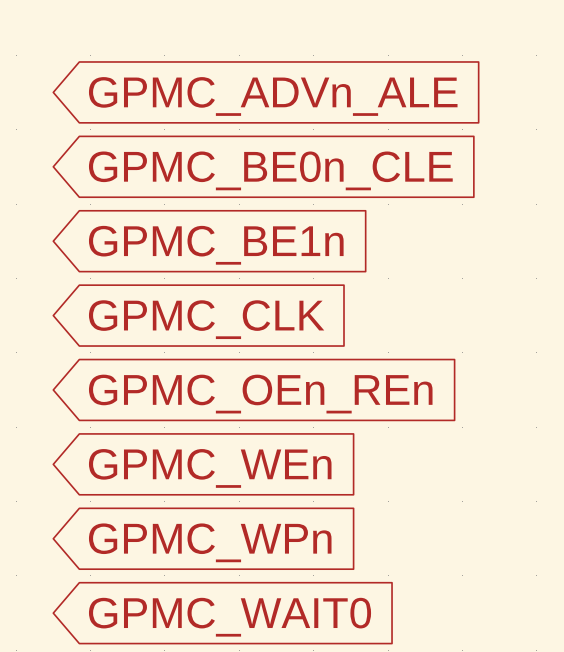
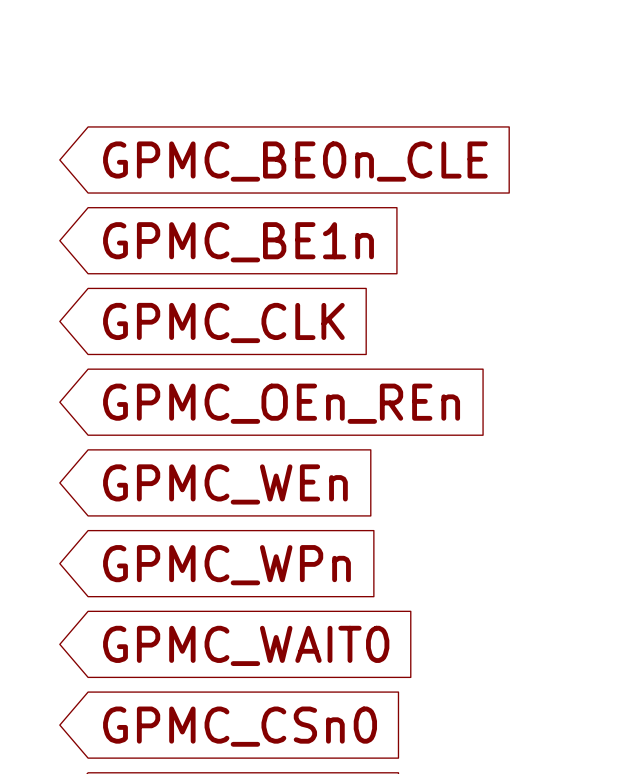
global label: GPMC_ADVn_ALE (273, 96) -> none

